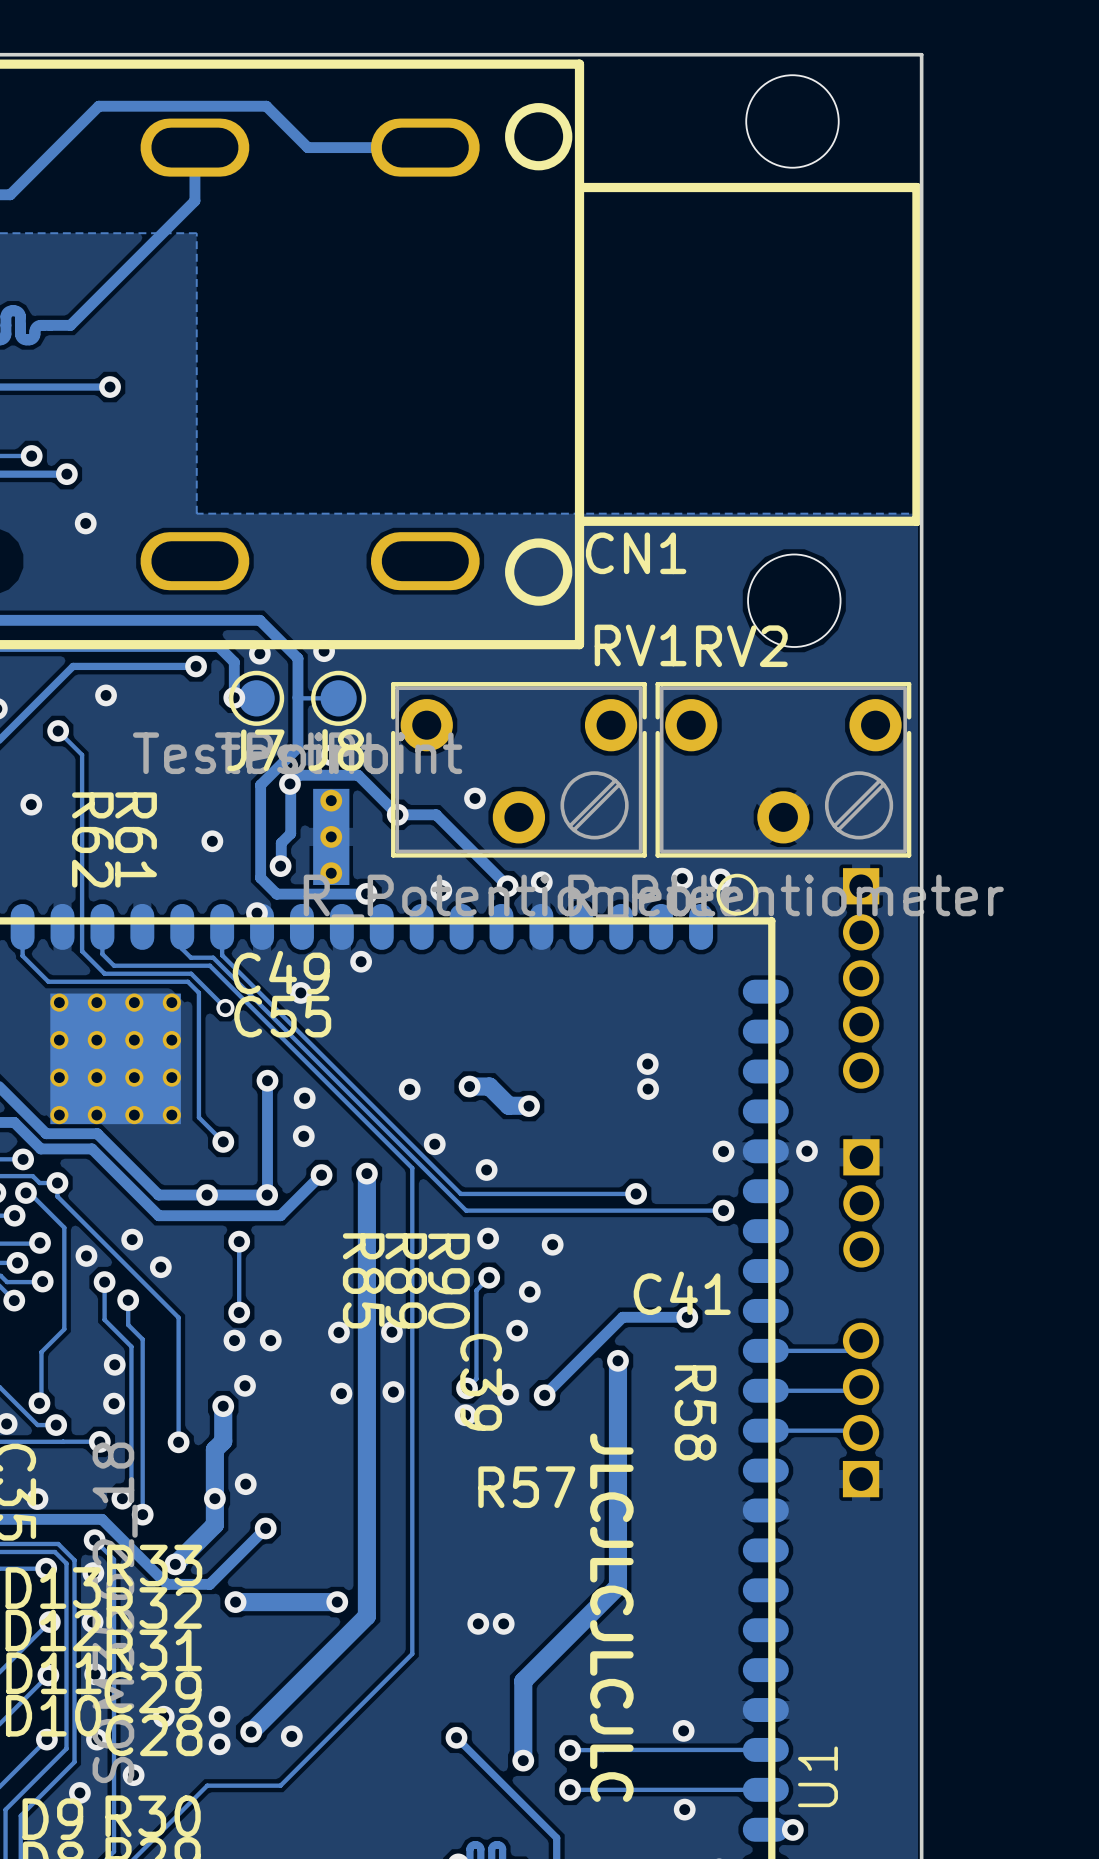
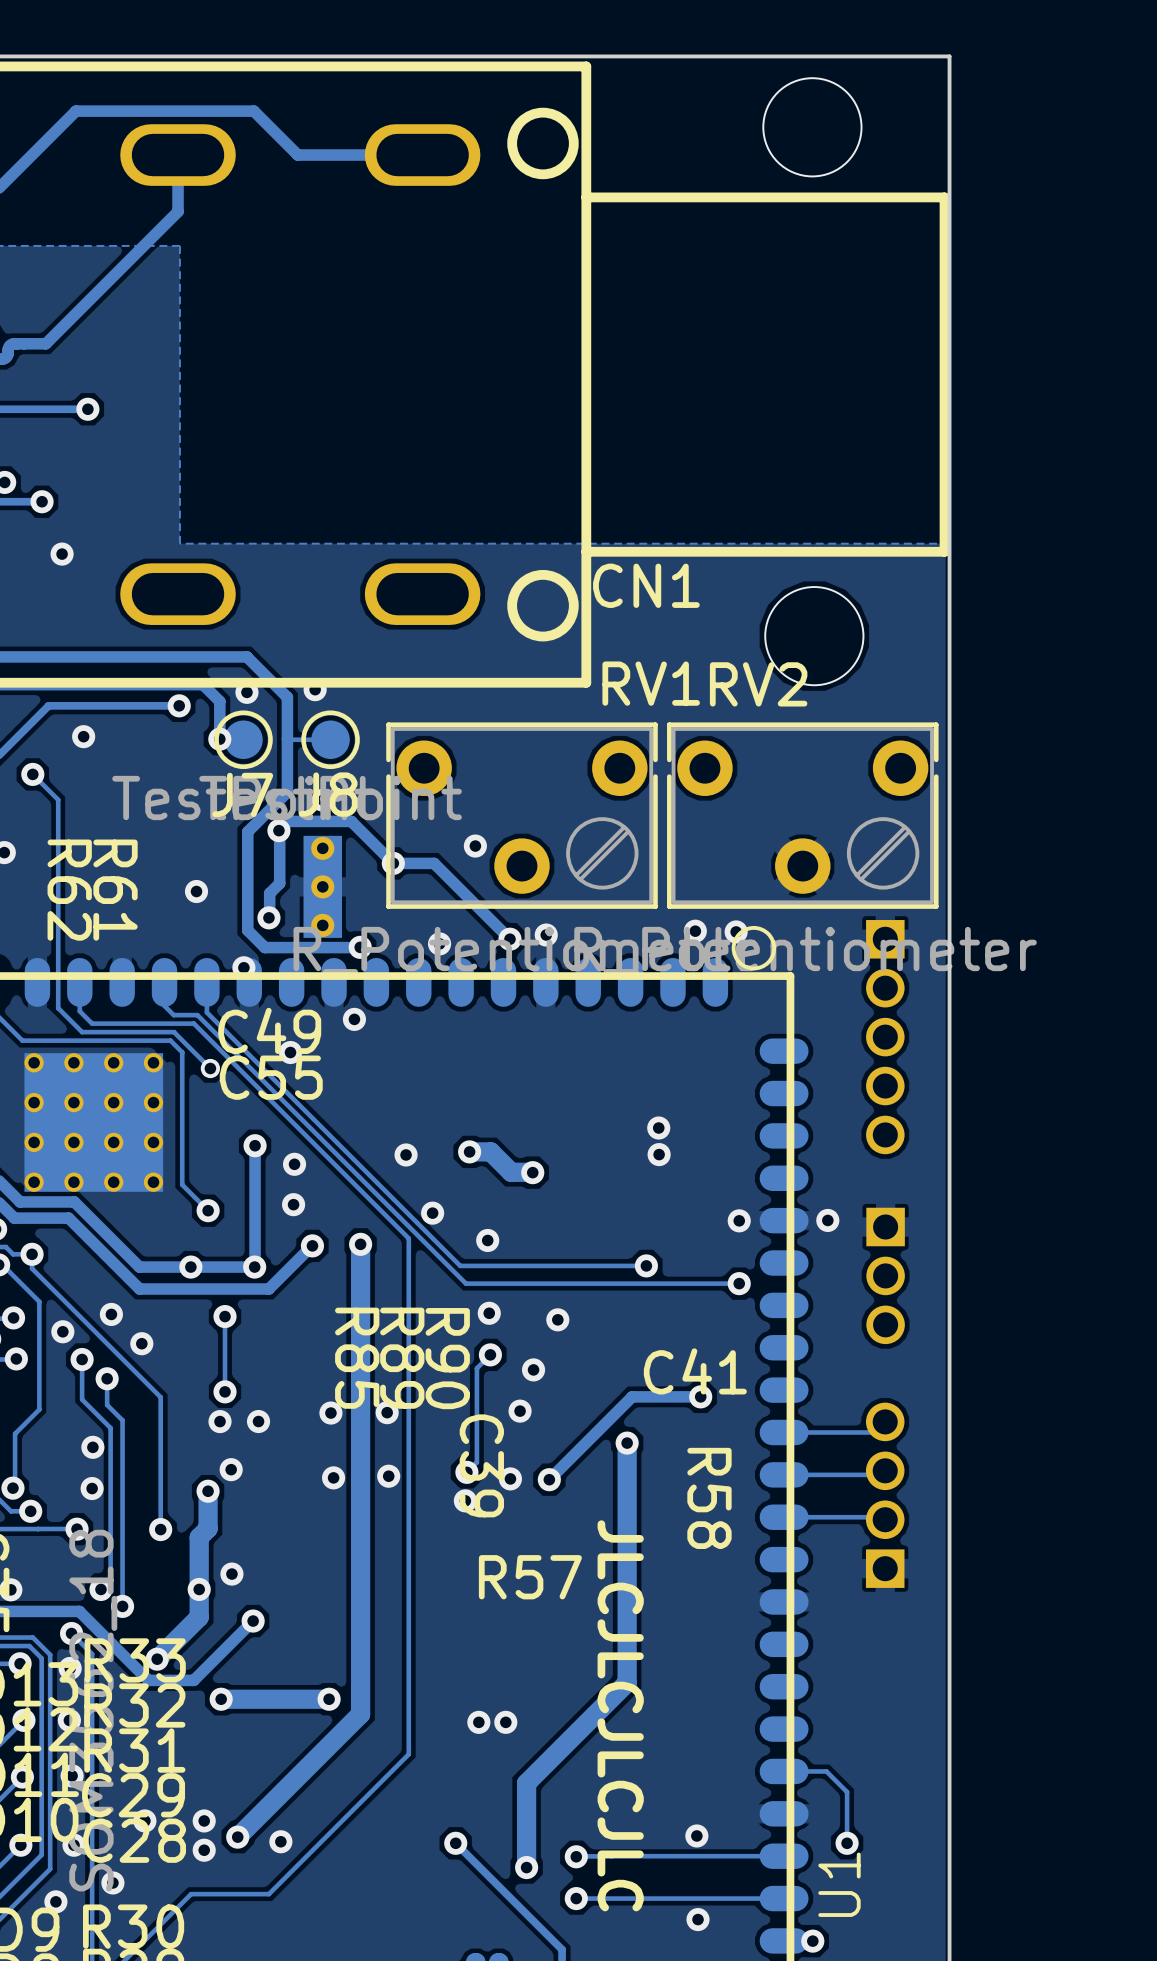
track: none -> (784, 1771) (826, 1771) (847, 1792) (847, 1843)
via: none -> (847, 1843)

